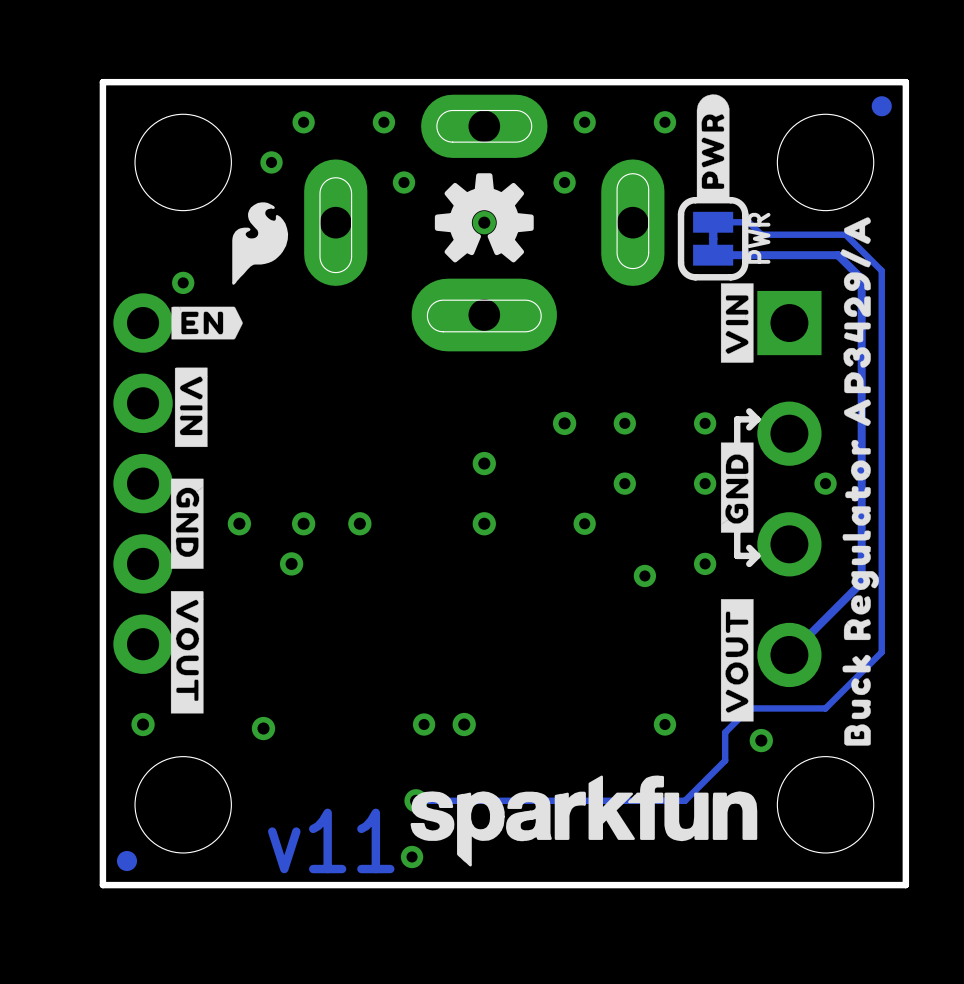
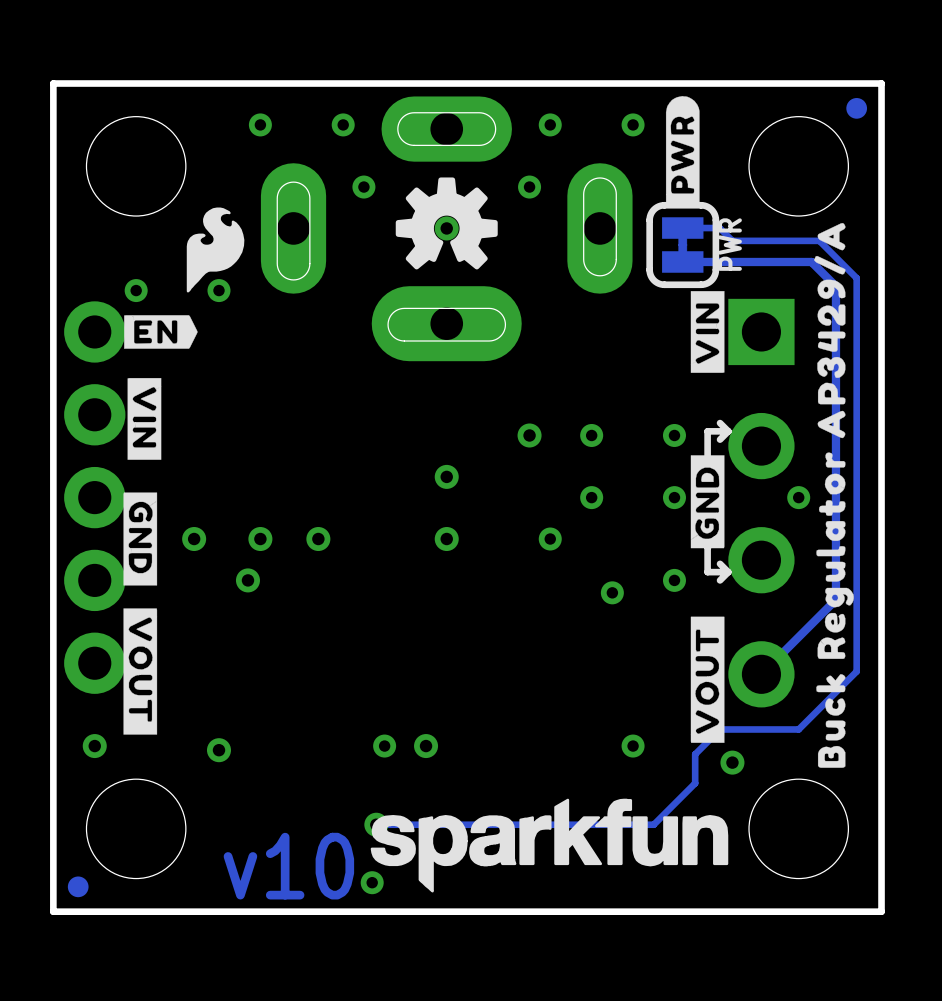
via position: (271, 162) -> (218, 290)
text: v11 (331, 840) -> v10 (288, 866)

